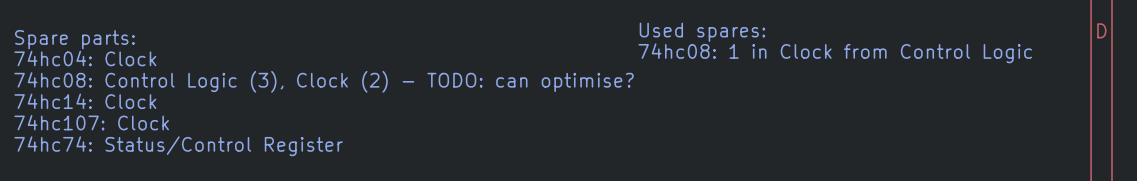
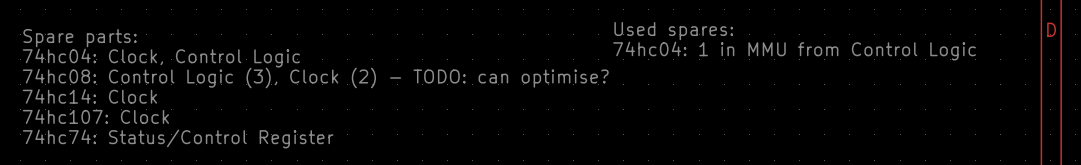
text: 74hc08: 1 in Clock from Control Logic (835, 53) -> 74hc04: 1 in MMU from Control Logic (794, 51)
text: 74hc04: Clock (85, 58) -> 74hc04: Clock, Control Logic (161, 58)

